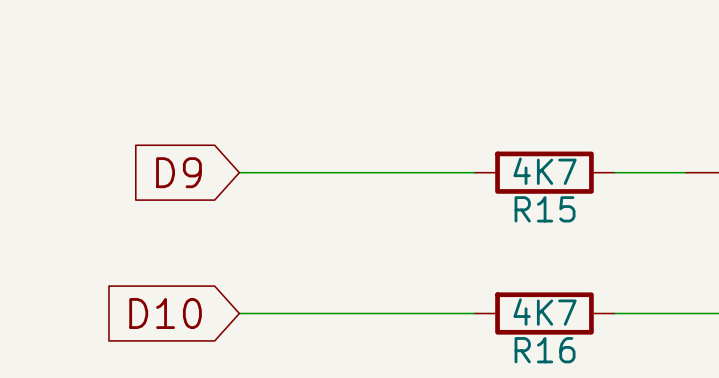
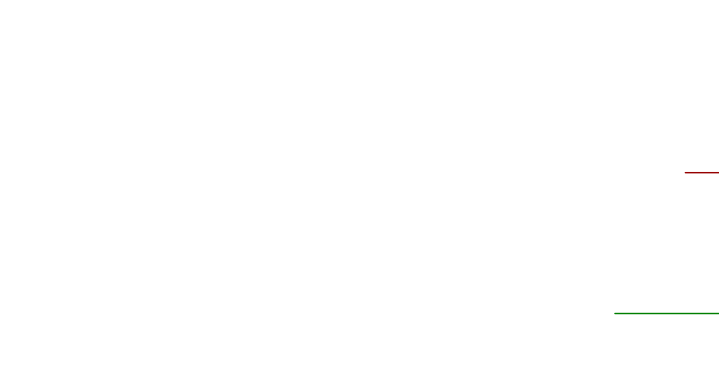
global label: D9 (178, 172) -> none
wire: (239, 172) (474, 172) -> none
R15: 4K7 (544, 172) -> none
wire: (614, 172) (685, 172) -> none
global label: D10 (165, 313) -> none
wire: (239, 313) (474, 313) -> none
R16: 4K7 (544, 313) -> none

